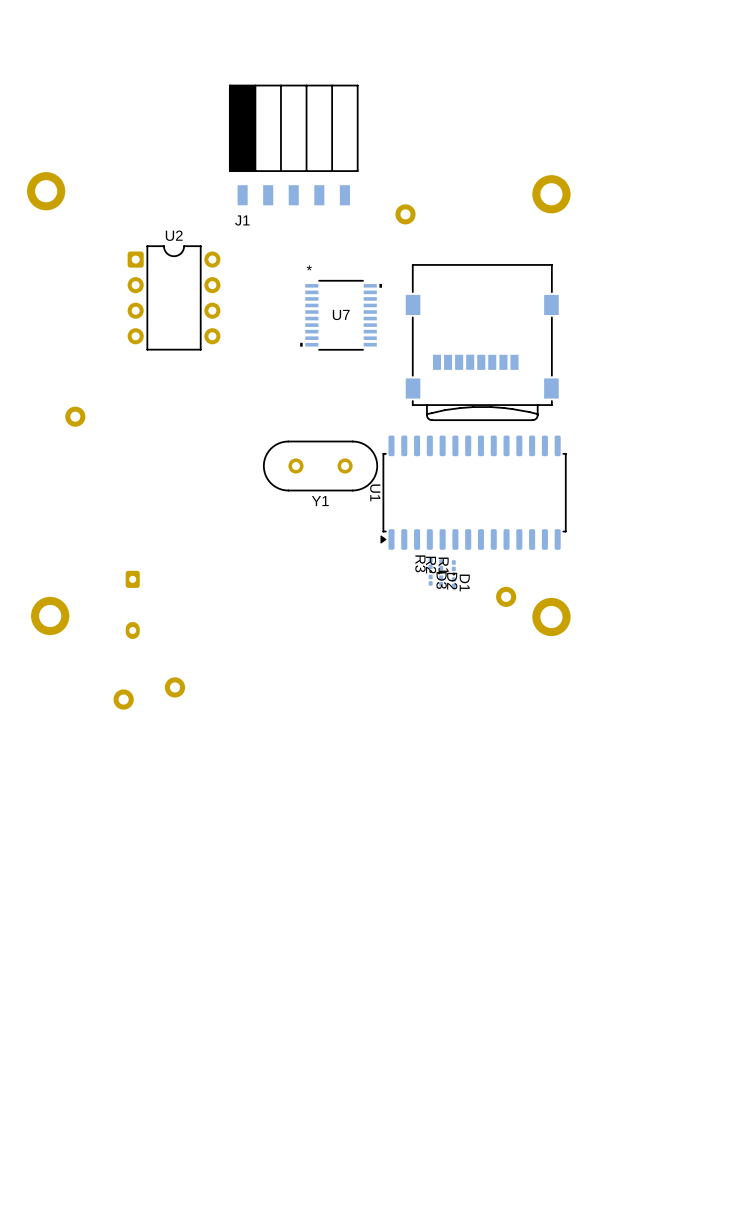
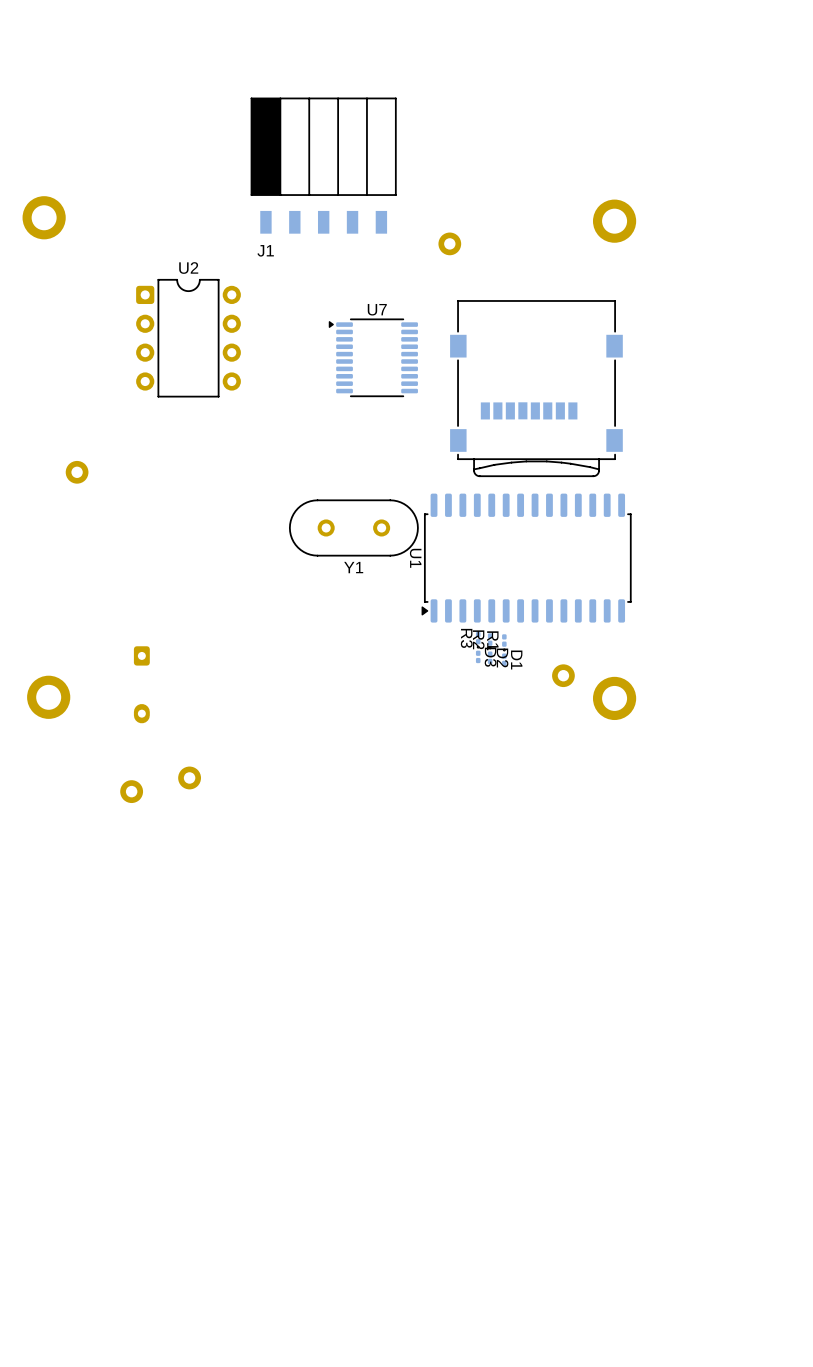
U7 footprint: [300, 280, 382, 351] -> [328, 318, 418, 397]
U7 name position: U7 (341, 314) -> U7 (377, 309)

